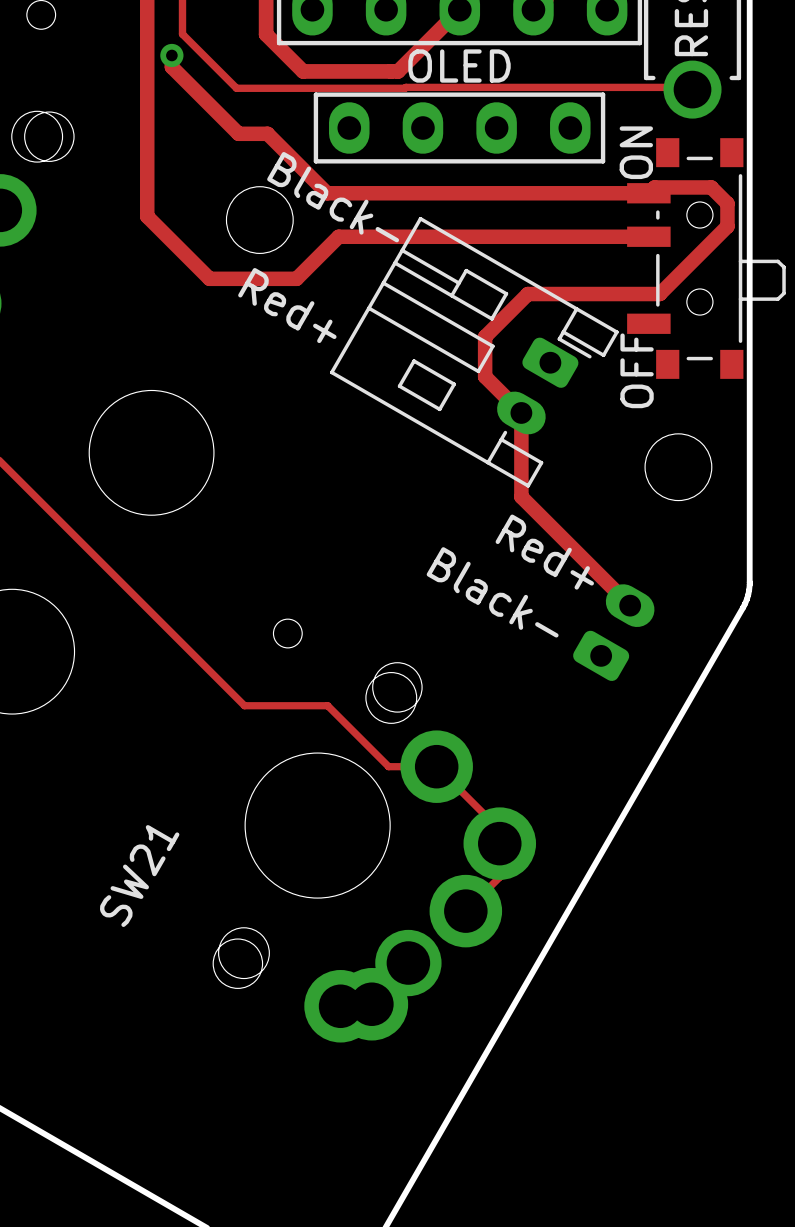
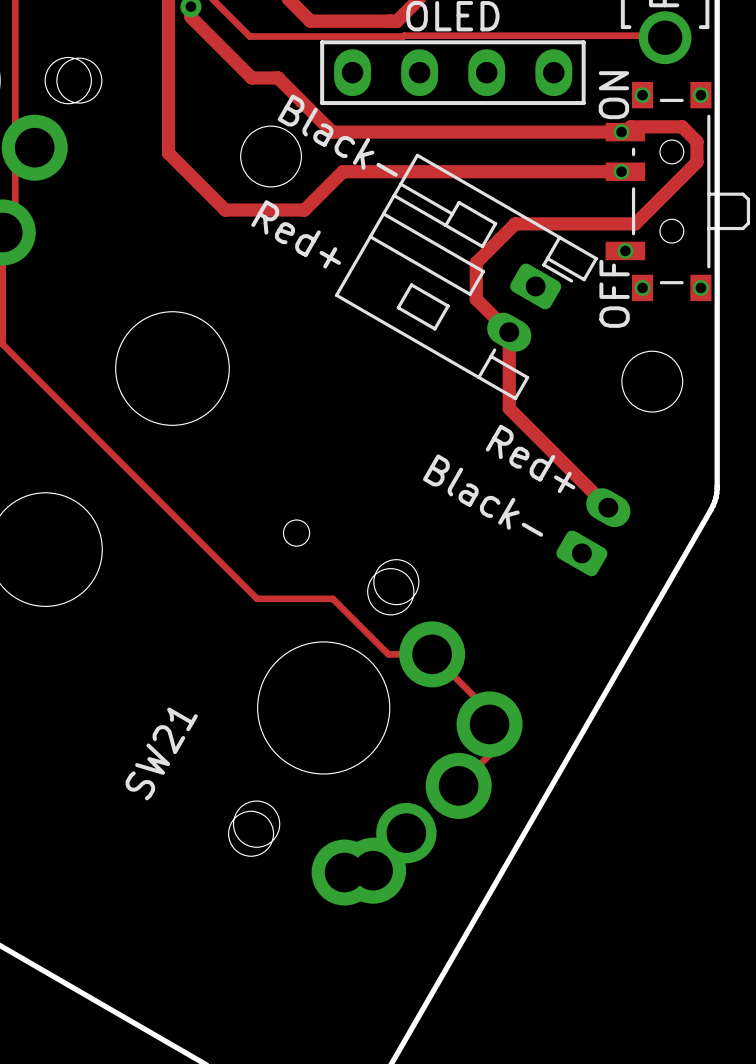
via: none -> (642, 95)
via: none -> (700, 95)
via: none -> (621, 132)
via: none -> (621, 171)
via: none -> (625, 250)
via: none -> (642, 287)
via: none -> (700, 287)

